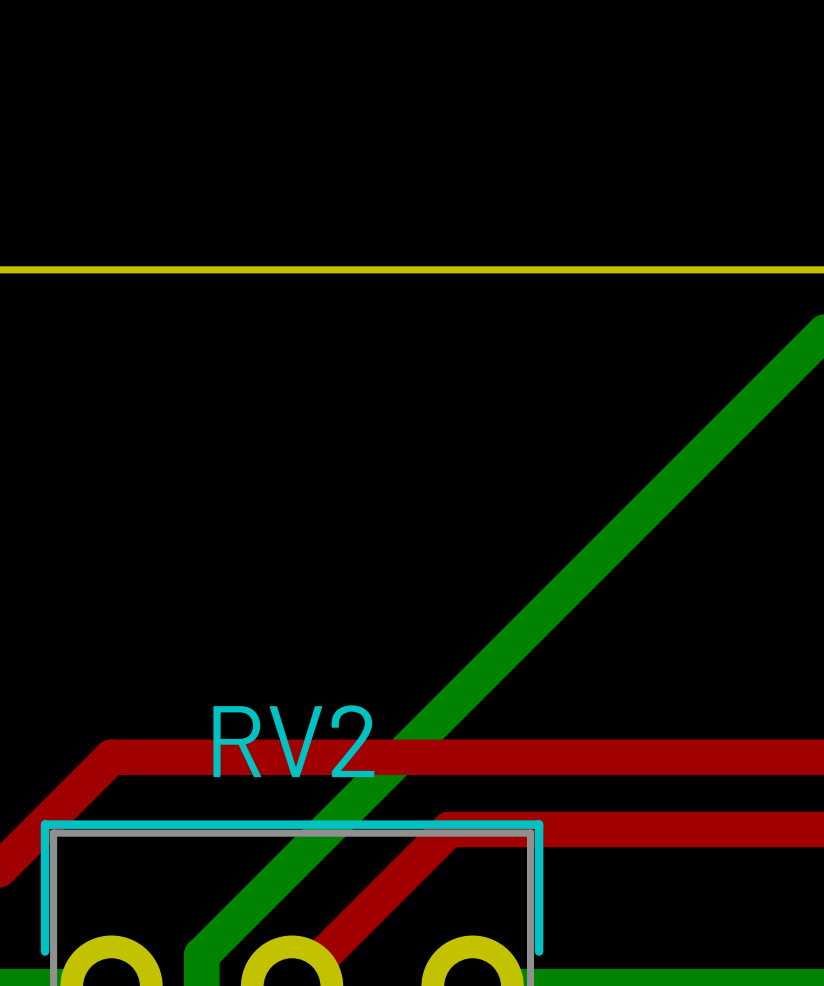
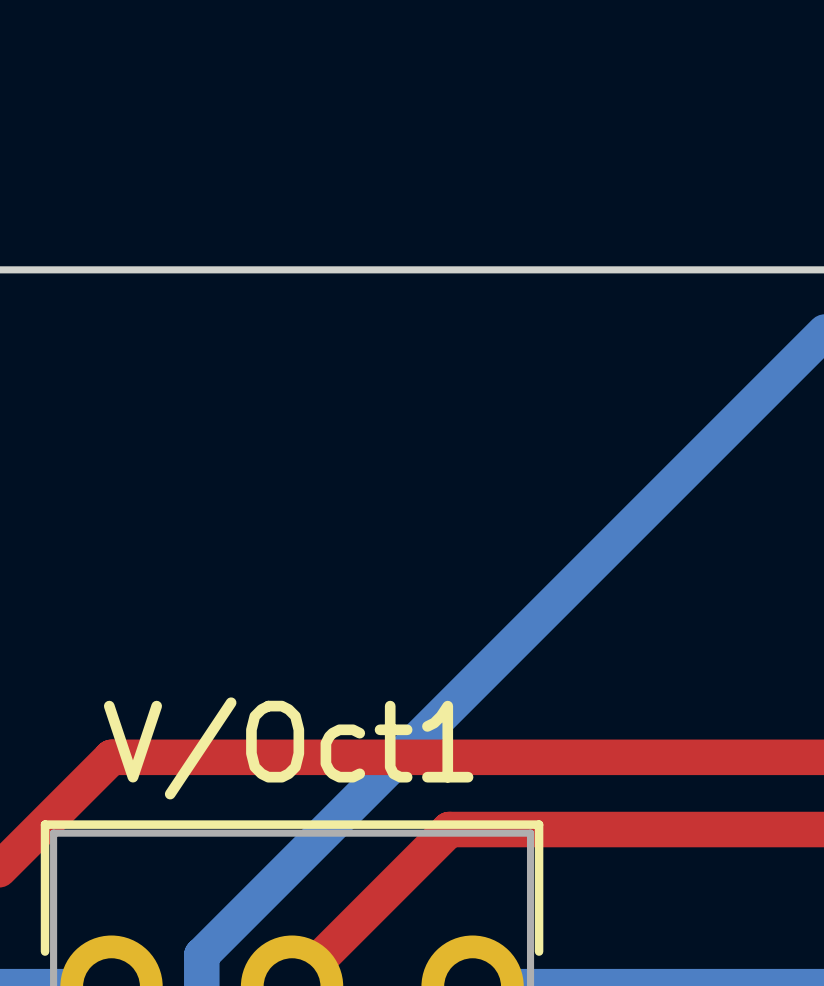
RV2 name: RV2 (293, 741) -> V/Oct1 (288, 748)

